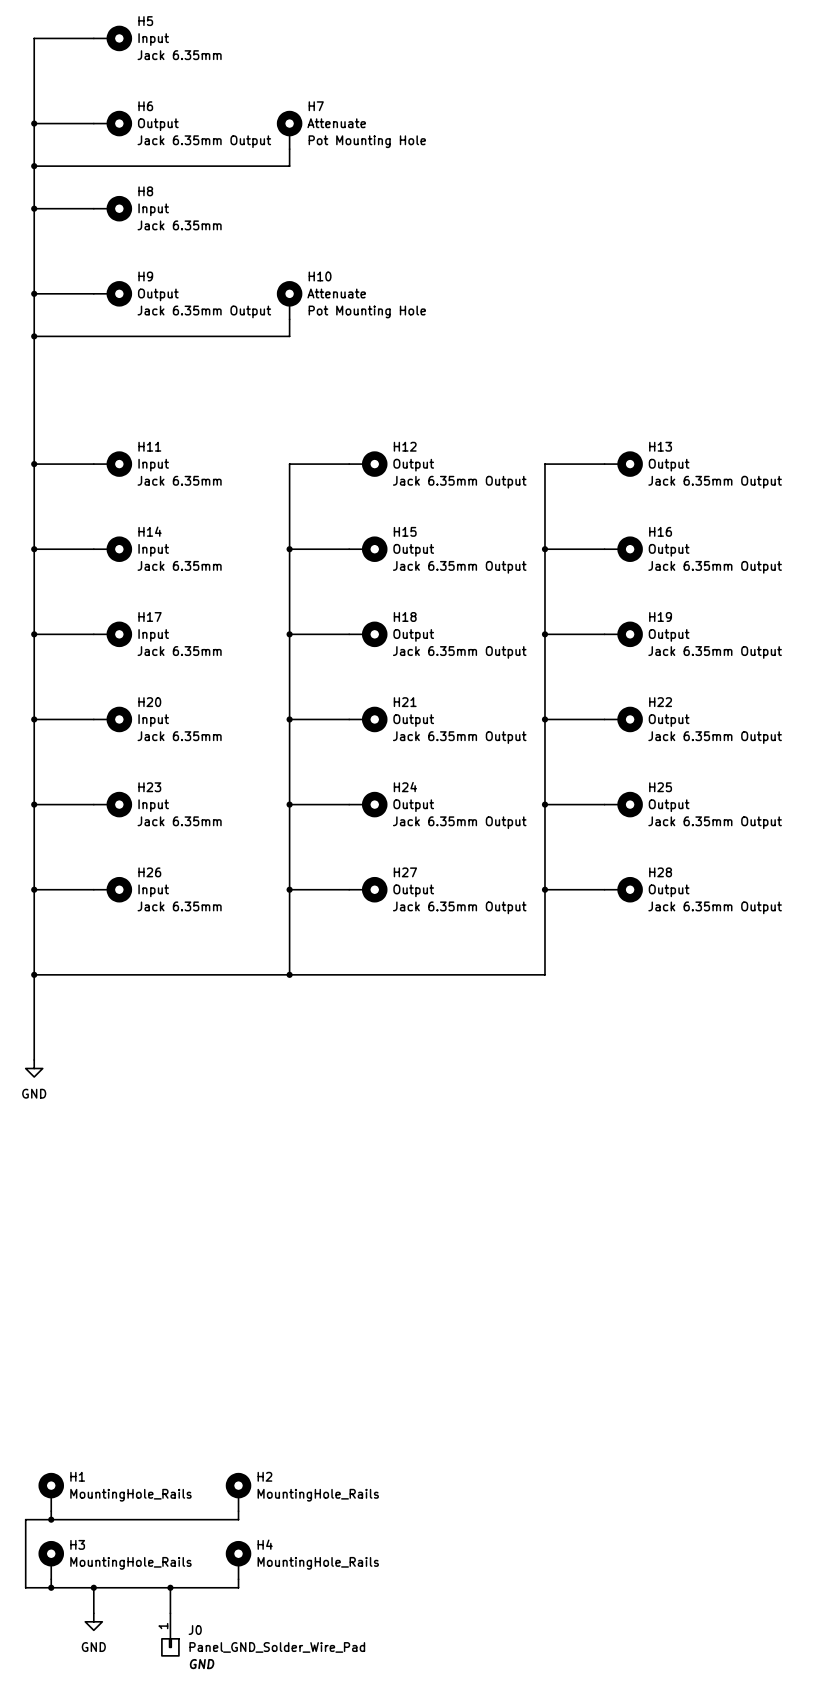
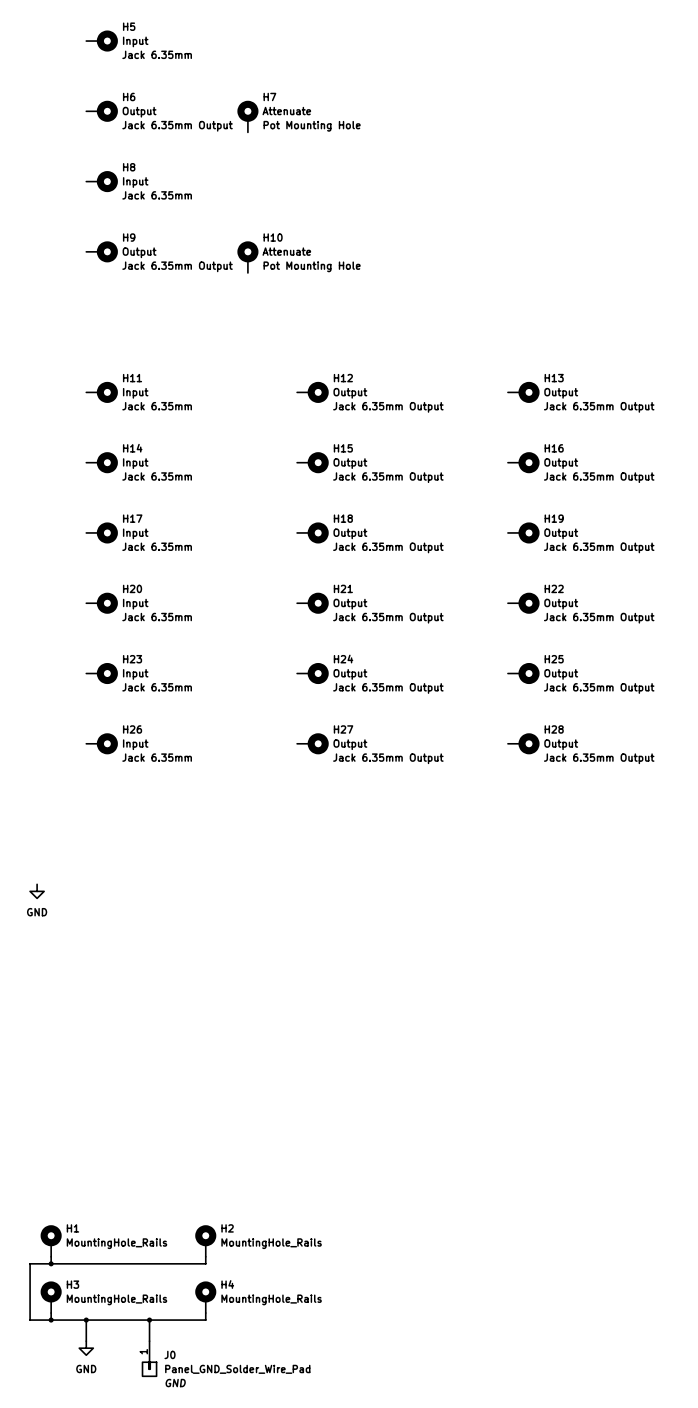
wire: (93, 38) (34, 38) (34, 1059) -> none
wire: (34, 123) (93, 123) -> none
junction: (34, 123) -> none
wire: (289, 149) (289, 166) (34, 166) -> none
junction: (34, 166) -> none
wire: (34, 208) (93, 208) -> none
junction: (34, 208) -> none
wire: (34, 293) (93, 293) -> none
junction: (34, 293) -> none
wire: (289, 319) (289, 336) (34, 336) -> none
junction: (34, 336) -> none
wire: (34, 464) (93, 464) -> none
junction: (34, 464) -> none
wire: (349, 464) (289, 464) (289, 974) -> none
wire: (604, 464) (544, 464) (544, 974) (34, 974) -> none
wire: (34, 549) (93, 549) -> none
junction: (34, 549) -> none
wire: (289, 549) (349, 549) -> none
junction: (289, 549) -> none
wire: (544, 549) (604, 549) -> none
junction: (544, 549) -> none
wire: (34, 634) (93, 634) -> none
junction: (34, 634) -> none
wire: (289, 634) (349, 634) -> none
junction: (289, 634) -> none
wire: (544, 634) (604, 634) -> none
junction: (544, 634) -> none
wire: (34, 719) (93, 719) -> none
junction: (34, 719) -> none
wire: (289, 719) (349, 719) -> none
junction: (289, 719) -> none
wire: (544, 719) (604, 719) -> none
junction: (544, 719) -> none
wire: (34, 804) (93, 804) -> none
junction: (34, 804) -> none
wire: (289, 804) (349, 804) -> none
junction: (289, 804) -> none
wire: (544, 804) (604, 804) -> none
junction: (544, 804) -> none
wire: (34, 889) (93, 889) -> none
junction: (34, 889) -> none
wire: (289, 889) (349, 889) -> none
junction: (289, 889) -> none
wire: (544, 889) (604, 889) -> none
junction: (544, 889) -> none
junction: (34, 974) -> none
junction: (289, 974) -> none

